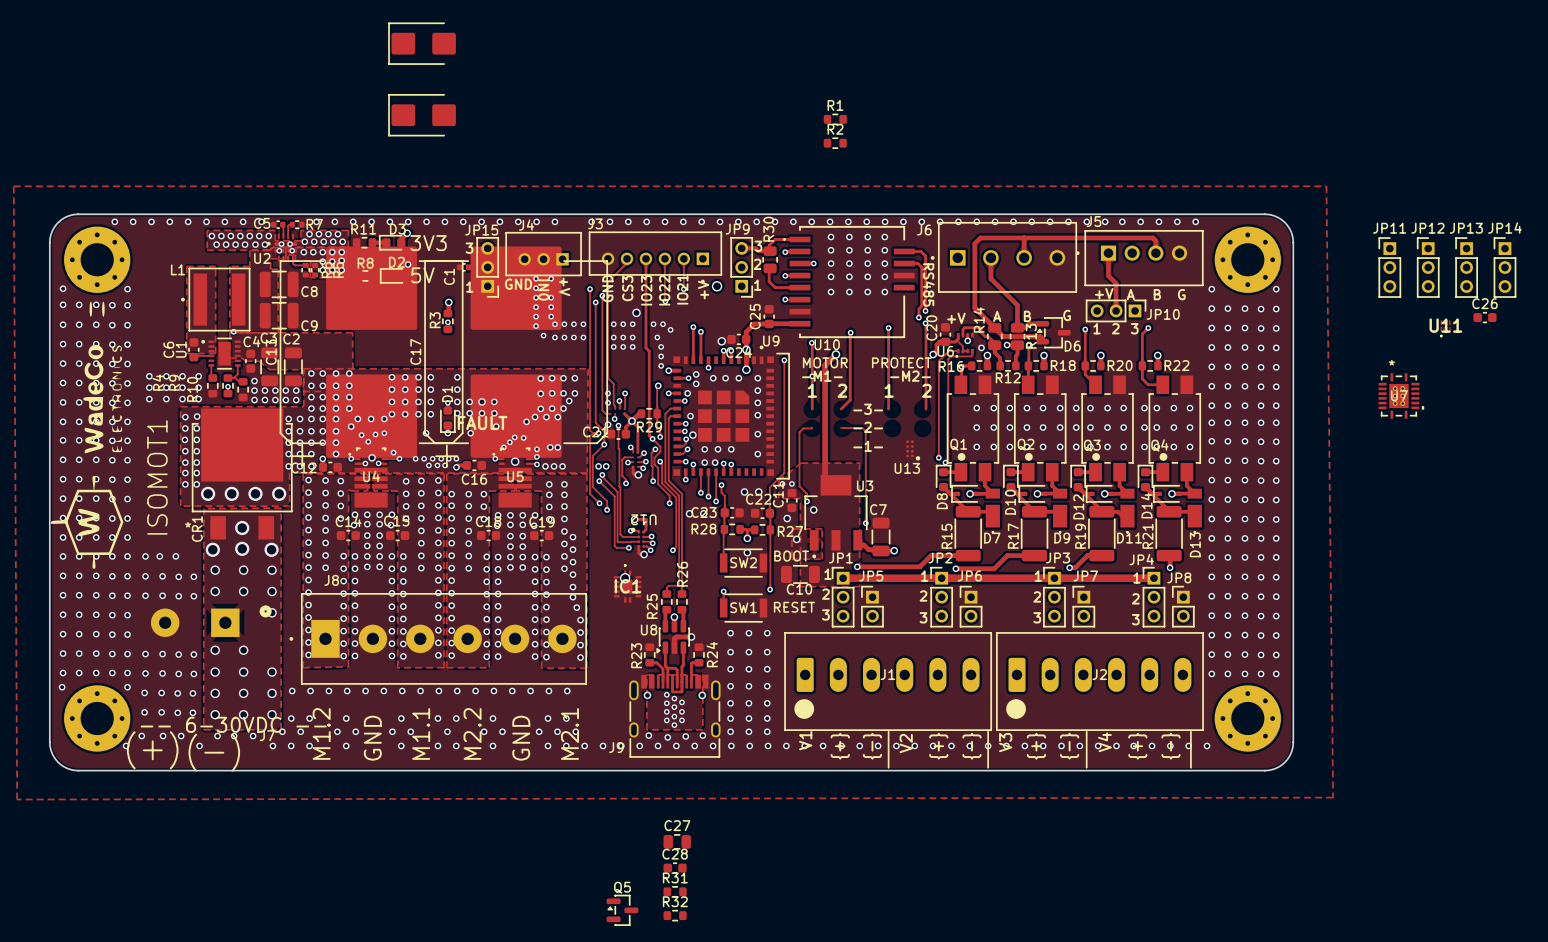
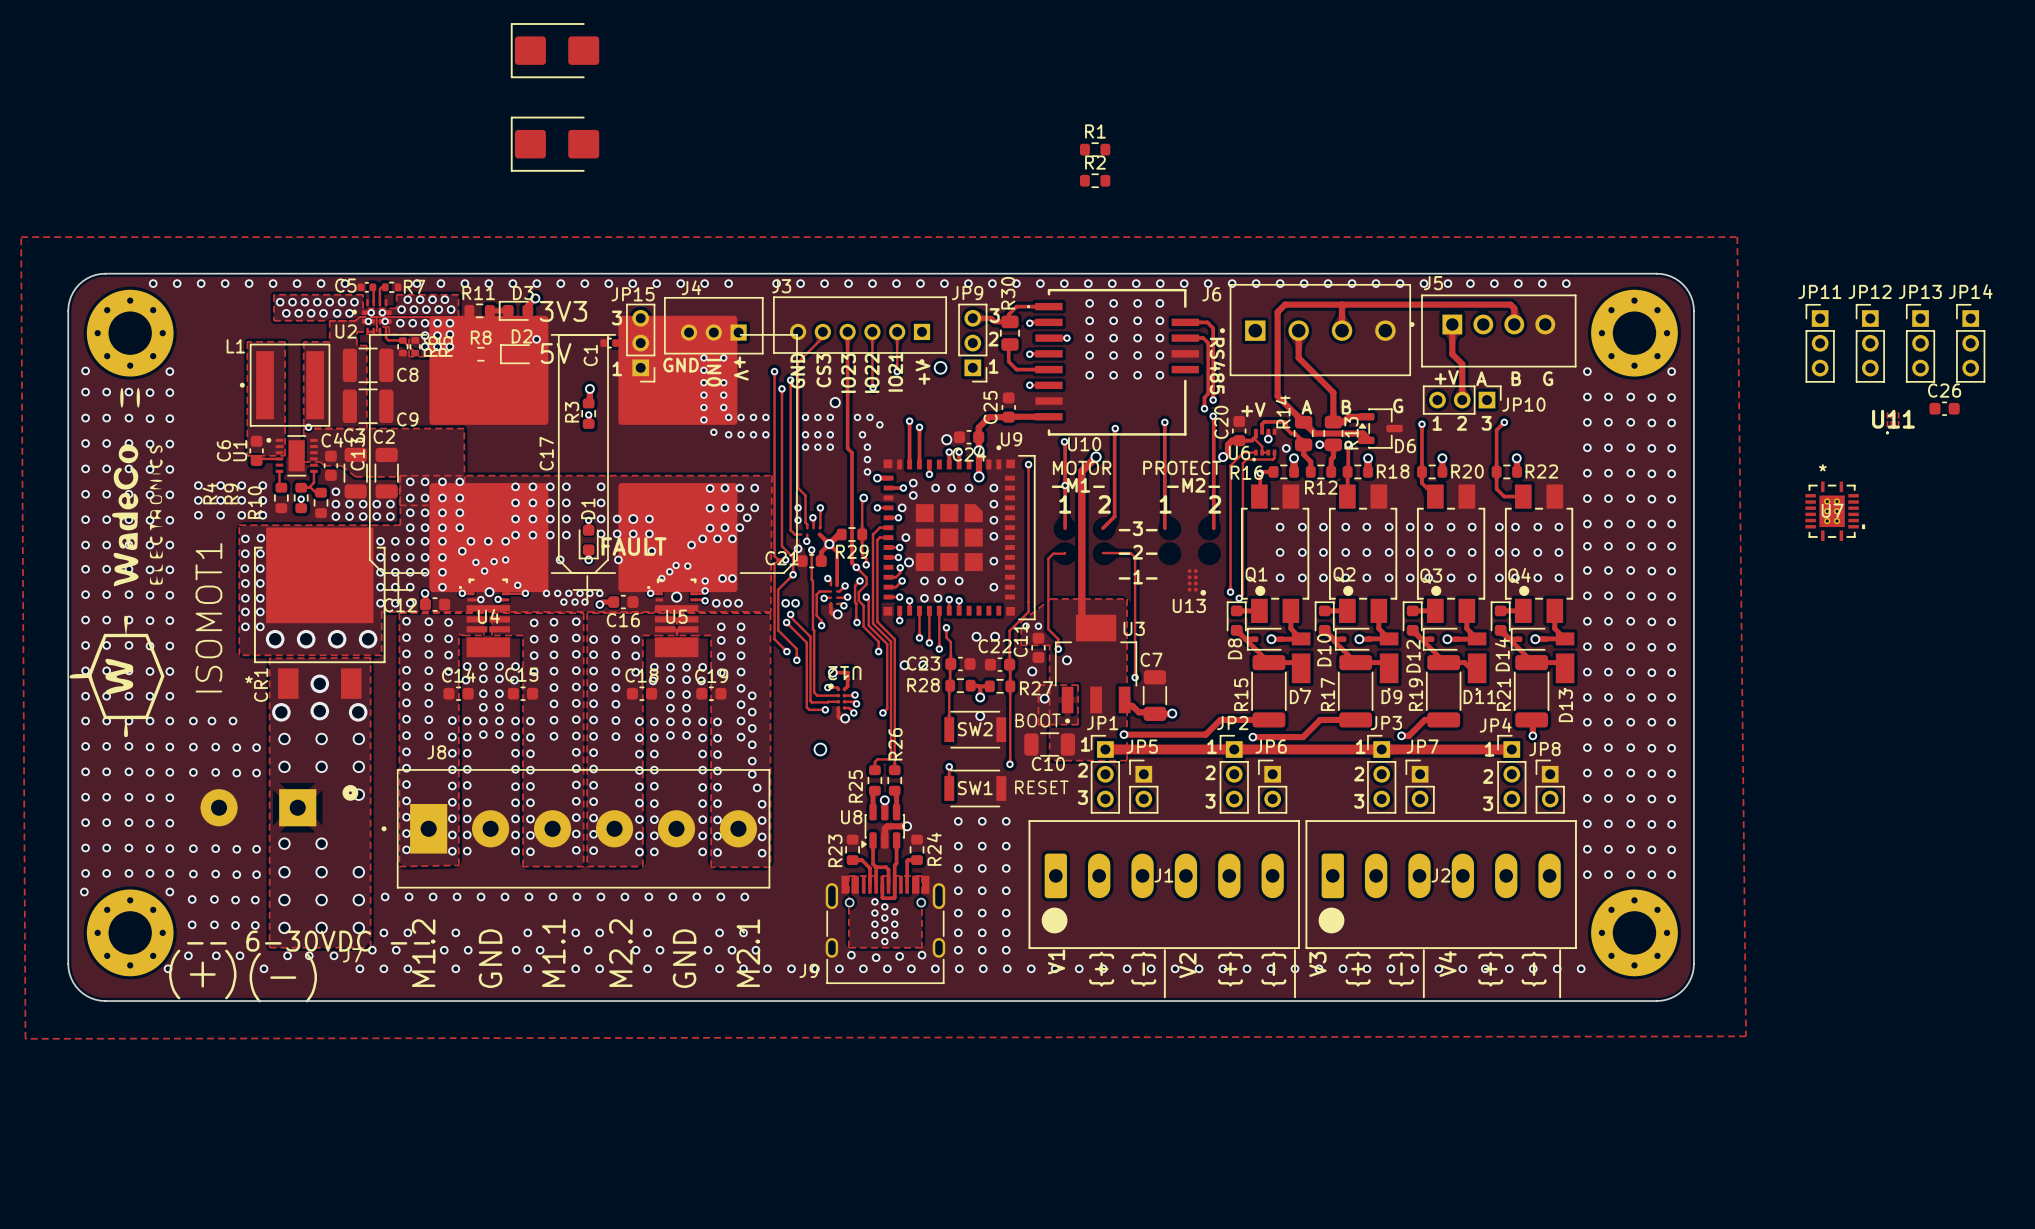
IC1: (627, 583) -> none
C27: (677, 841) -> none
C28: (675, 868) -> none
R31: (675, 891) -> none
Q5: (622, 910) -> none
R32: (675, 915) -> none

